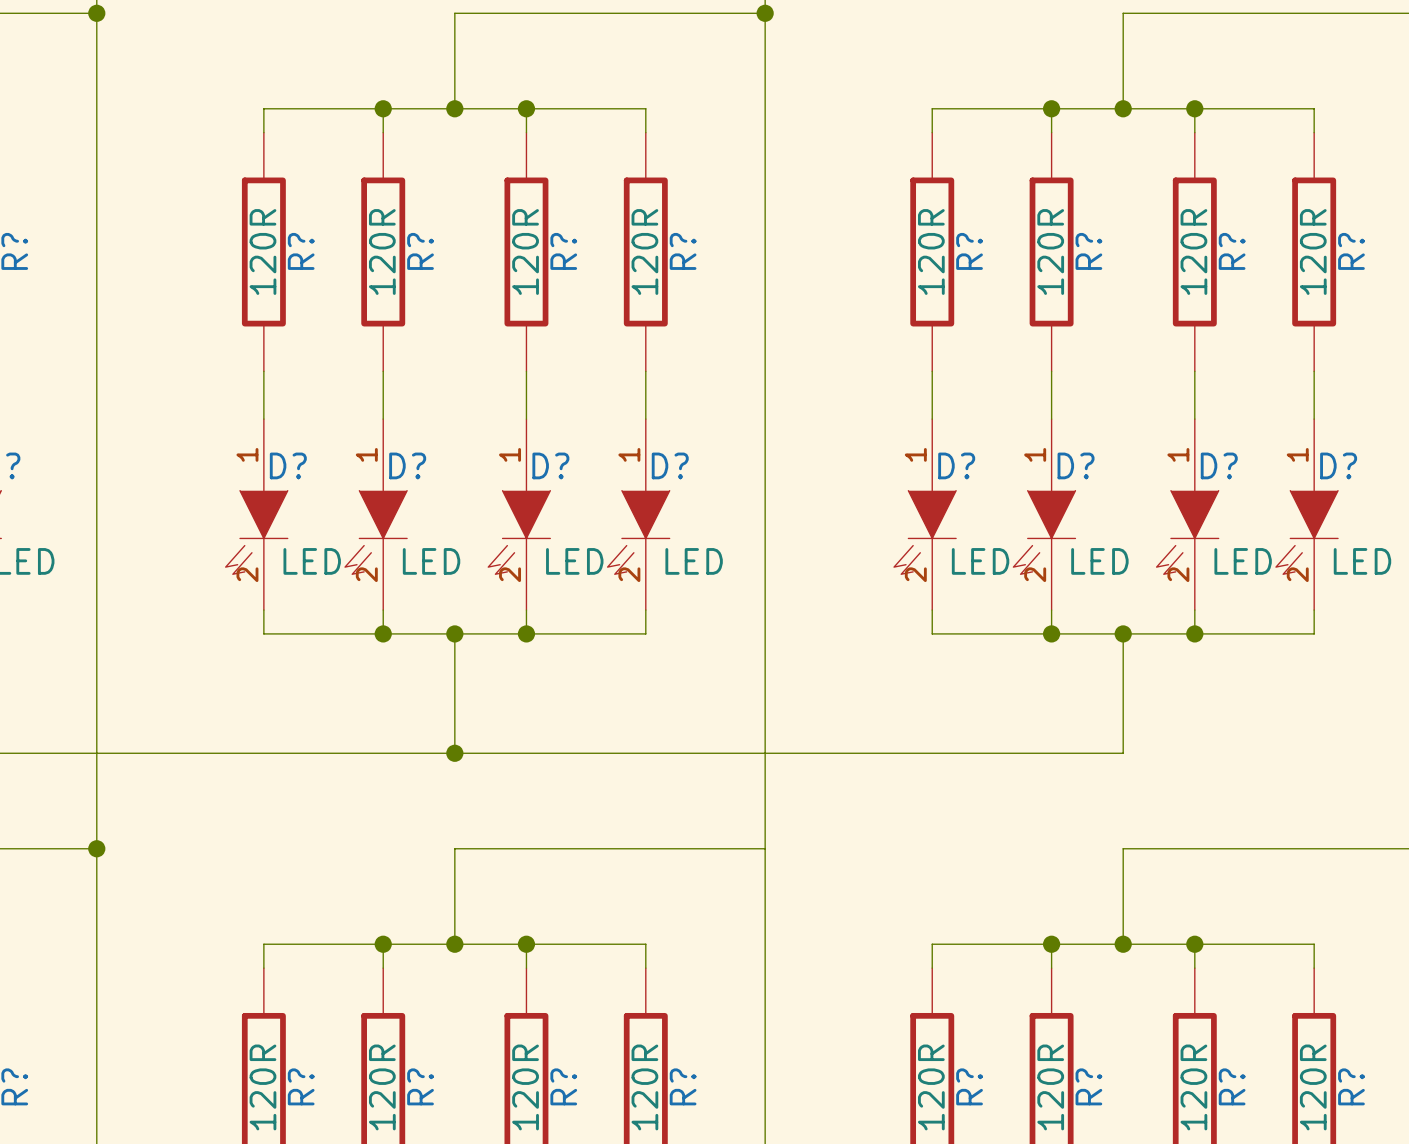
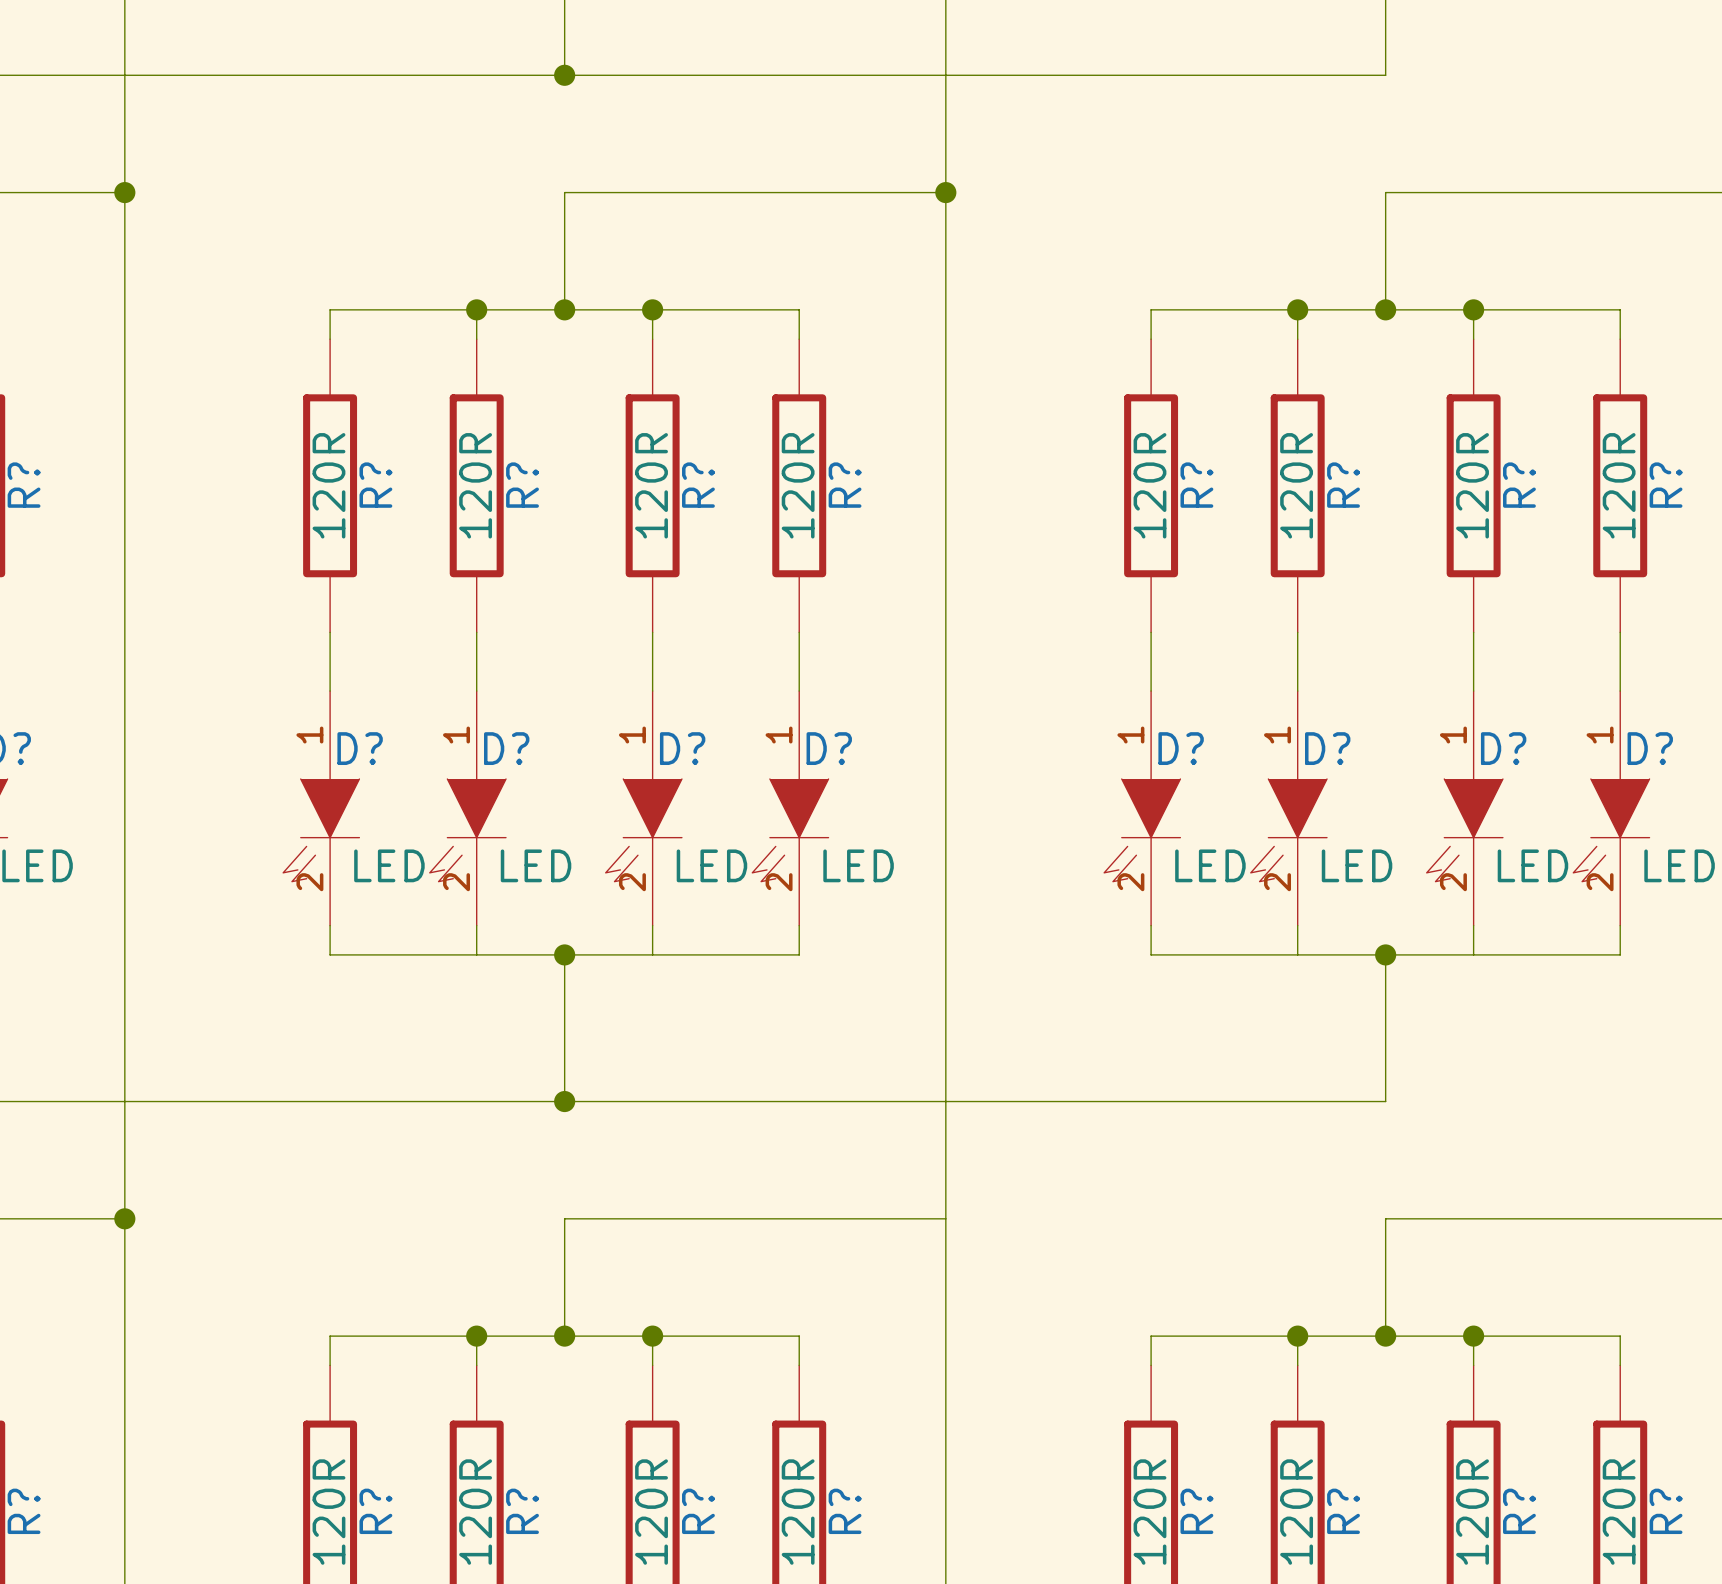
junction: (383, 633) -> none
junction: (526, 633) -> none
junction: (1051, 633) -> none
junction: (1194, 633) -> none

